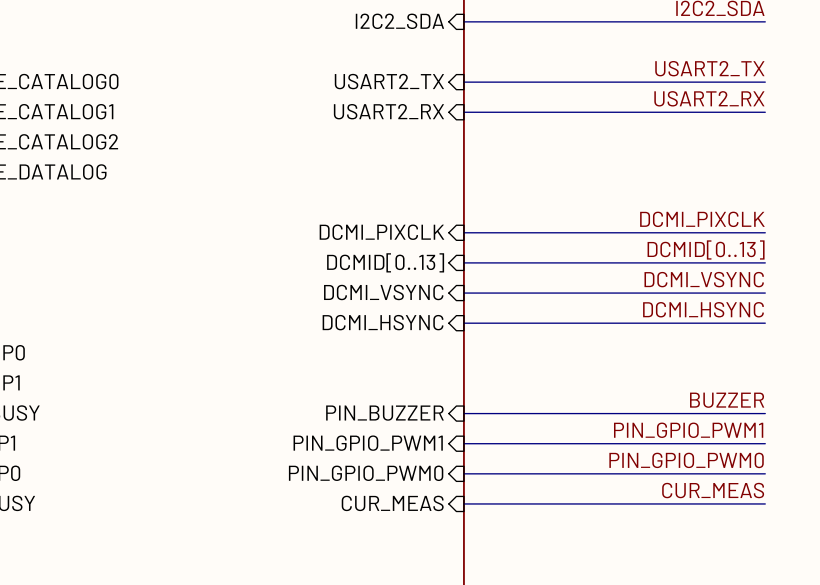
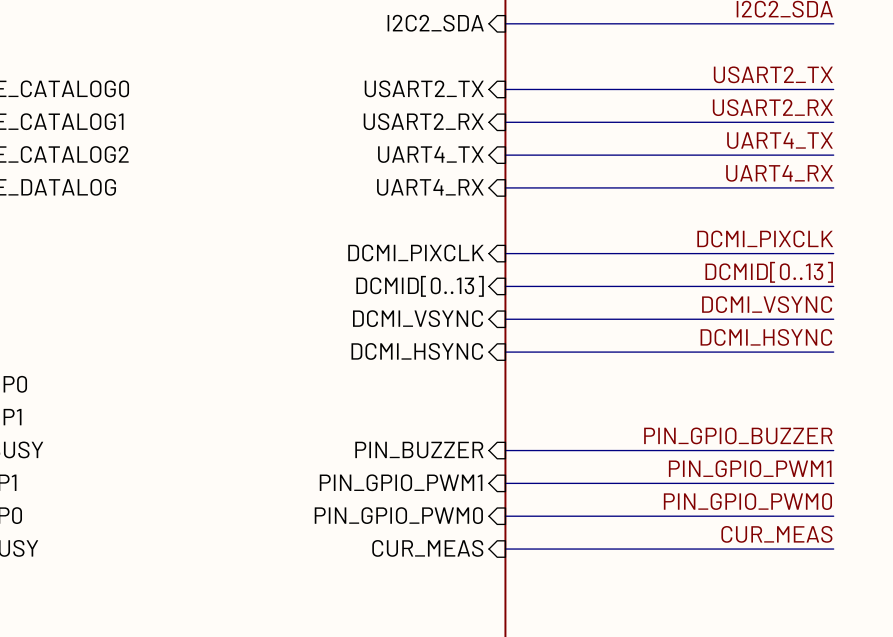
label: none -> UART4_TX (779, 140)
sheet pin: none -> UART4_TX (430, 154)
wire: none -> (505, 155) (833, 155)
label: none -> UART4_RX (779, 173)
sheet pin: none -> UART4_RX (430, 187)
wire: none -> (505, 187) (833, 187)
label: BUZZER (727, 400) -> PIN_GPIO_BUZZER (738, 435)

